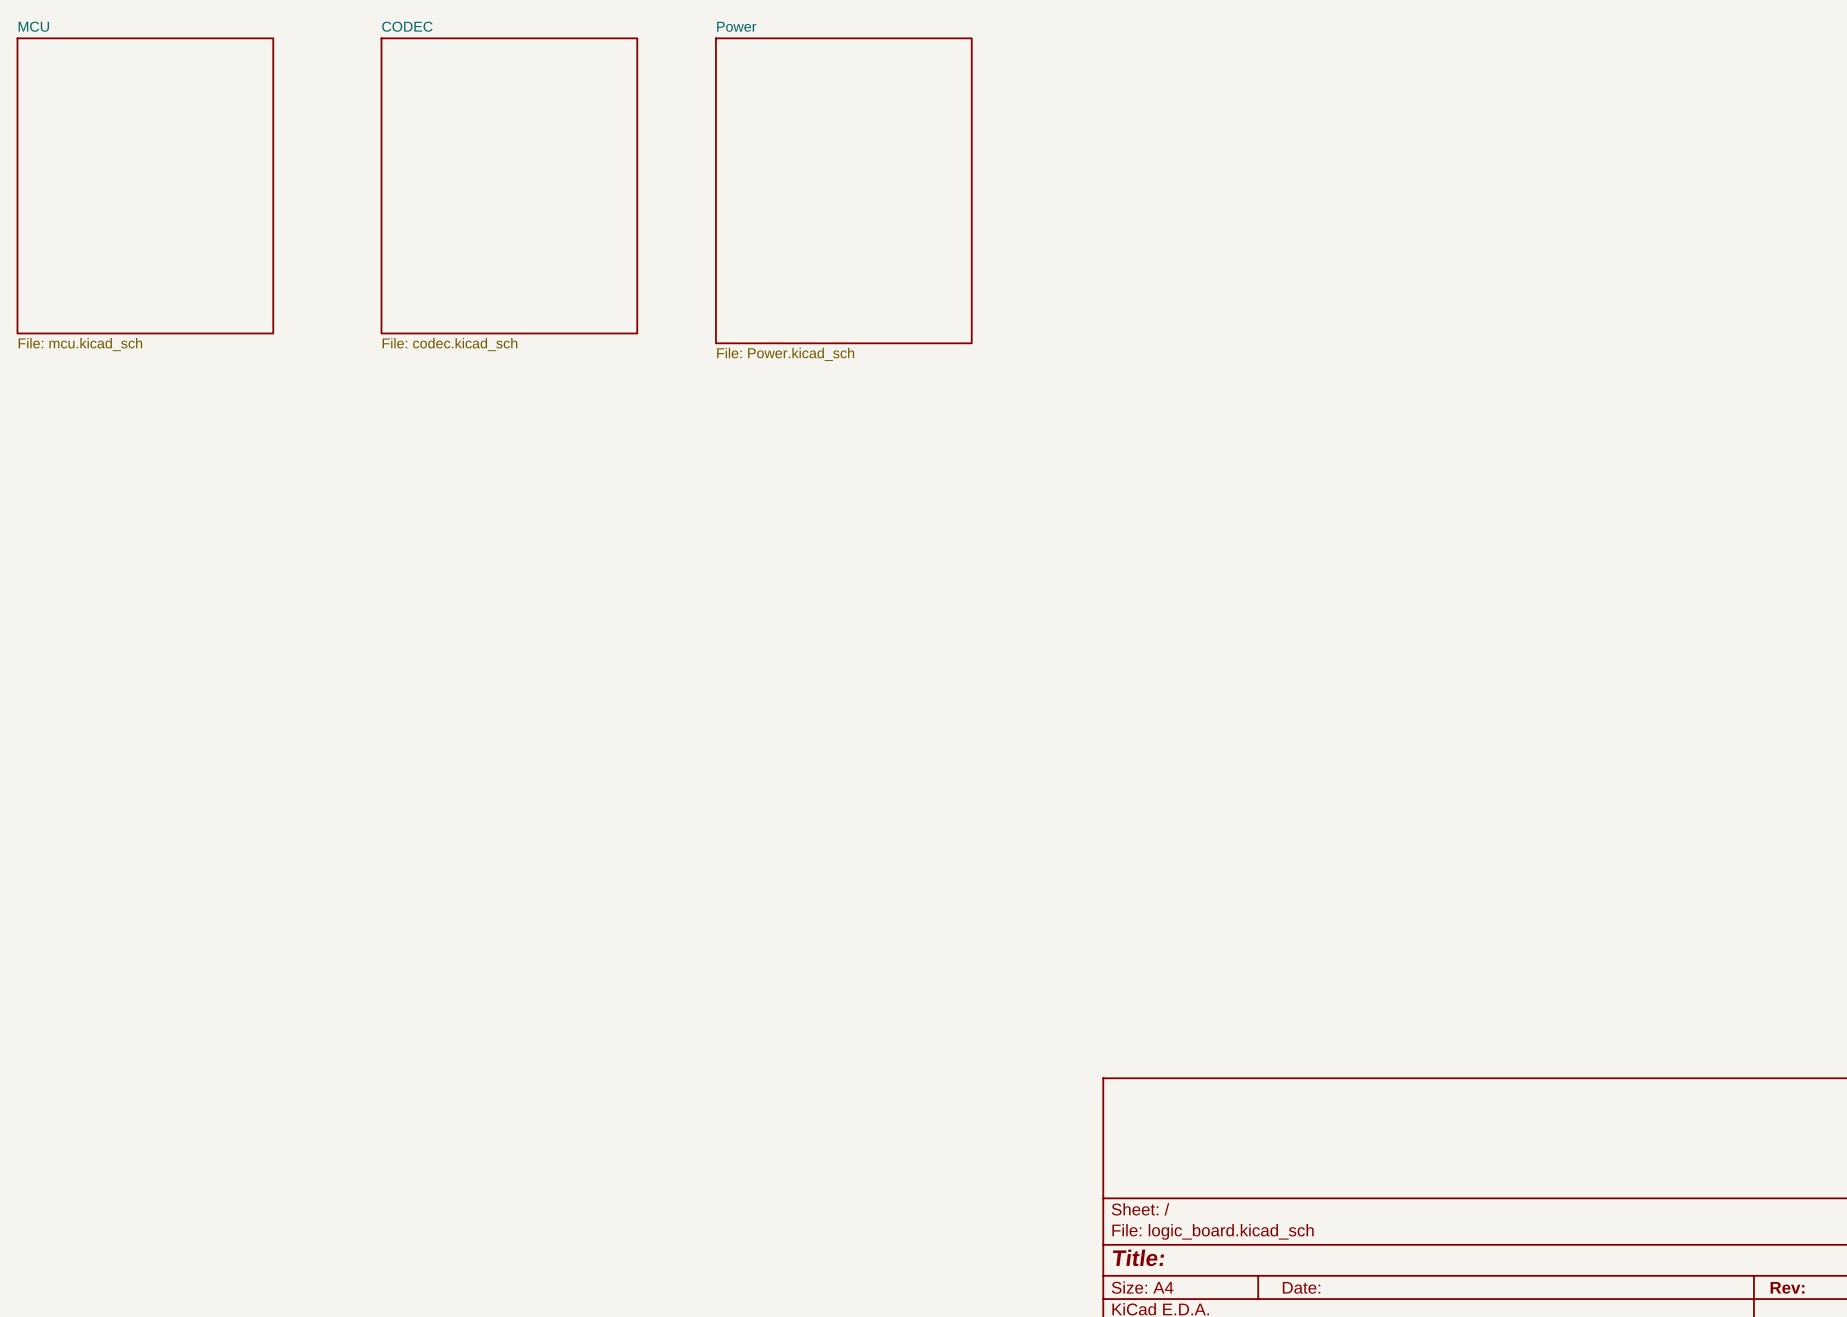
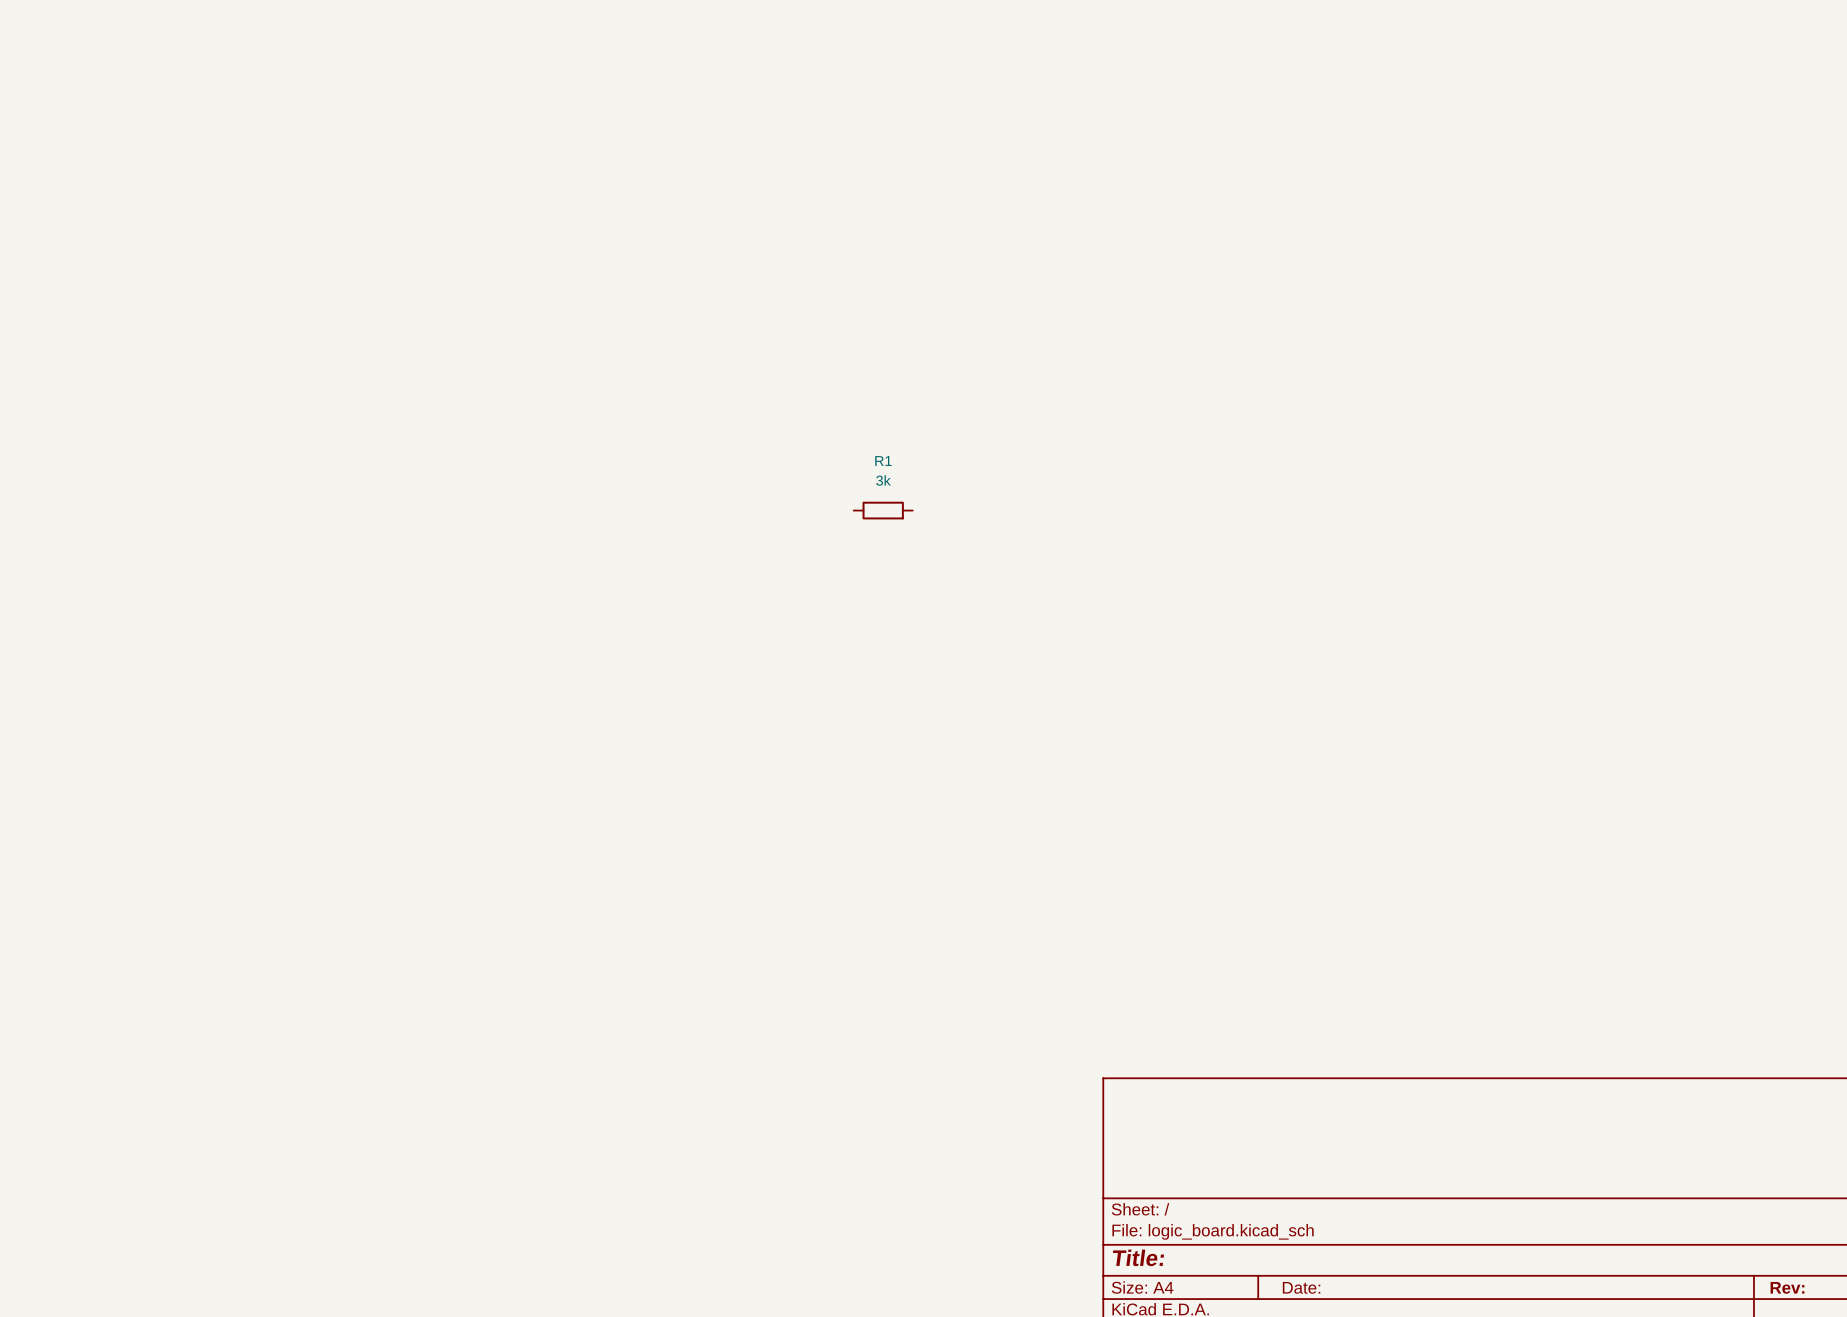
sheet MCU: File: mcu.kicad_sch (145, 185) -> none
sheet CODEC: File: codec.kicad_sch (509, 185) -> none
sheet Power: File: Power.kicad_sch (843, 190) -> none
R1: none -> 3k (883, 510)

